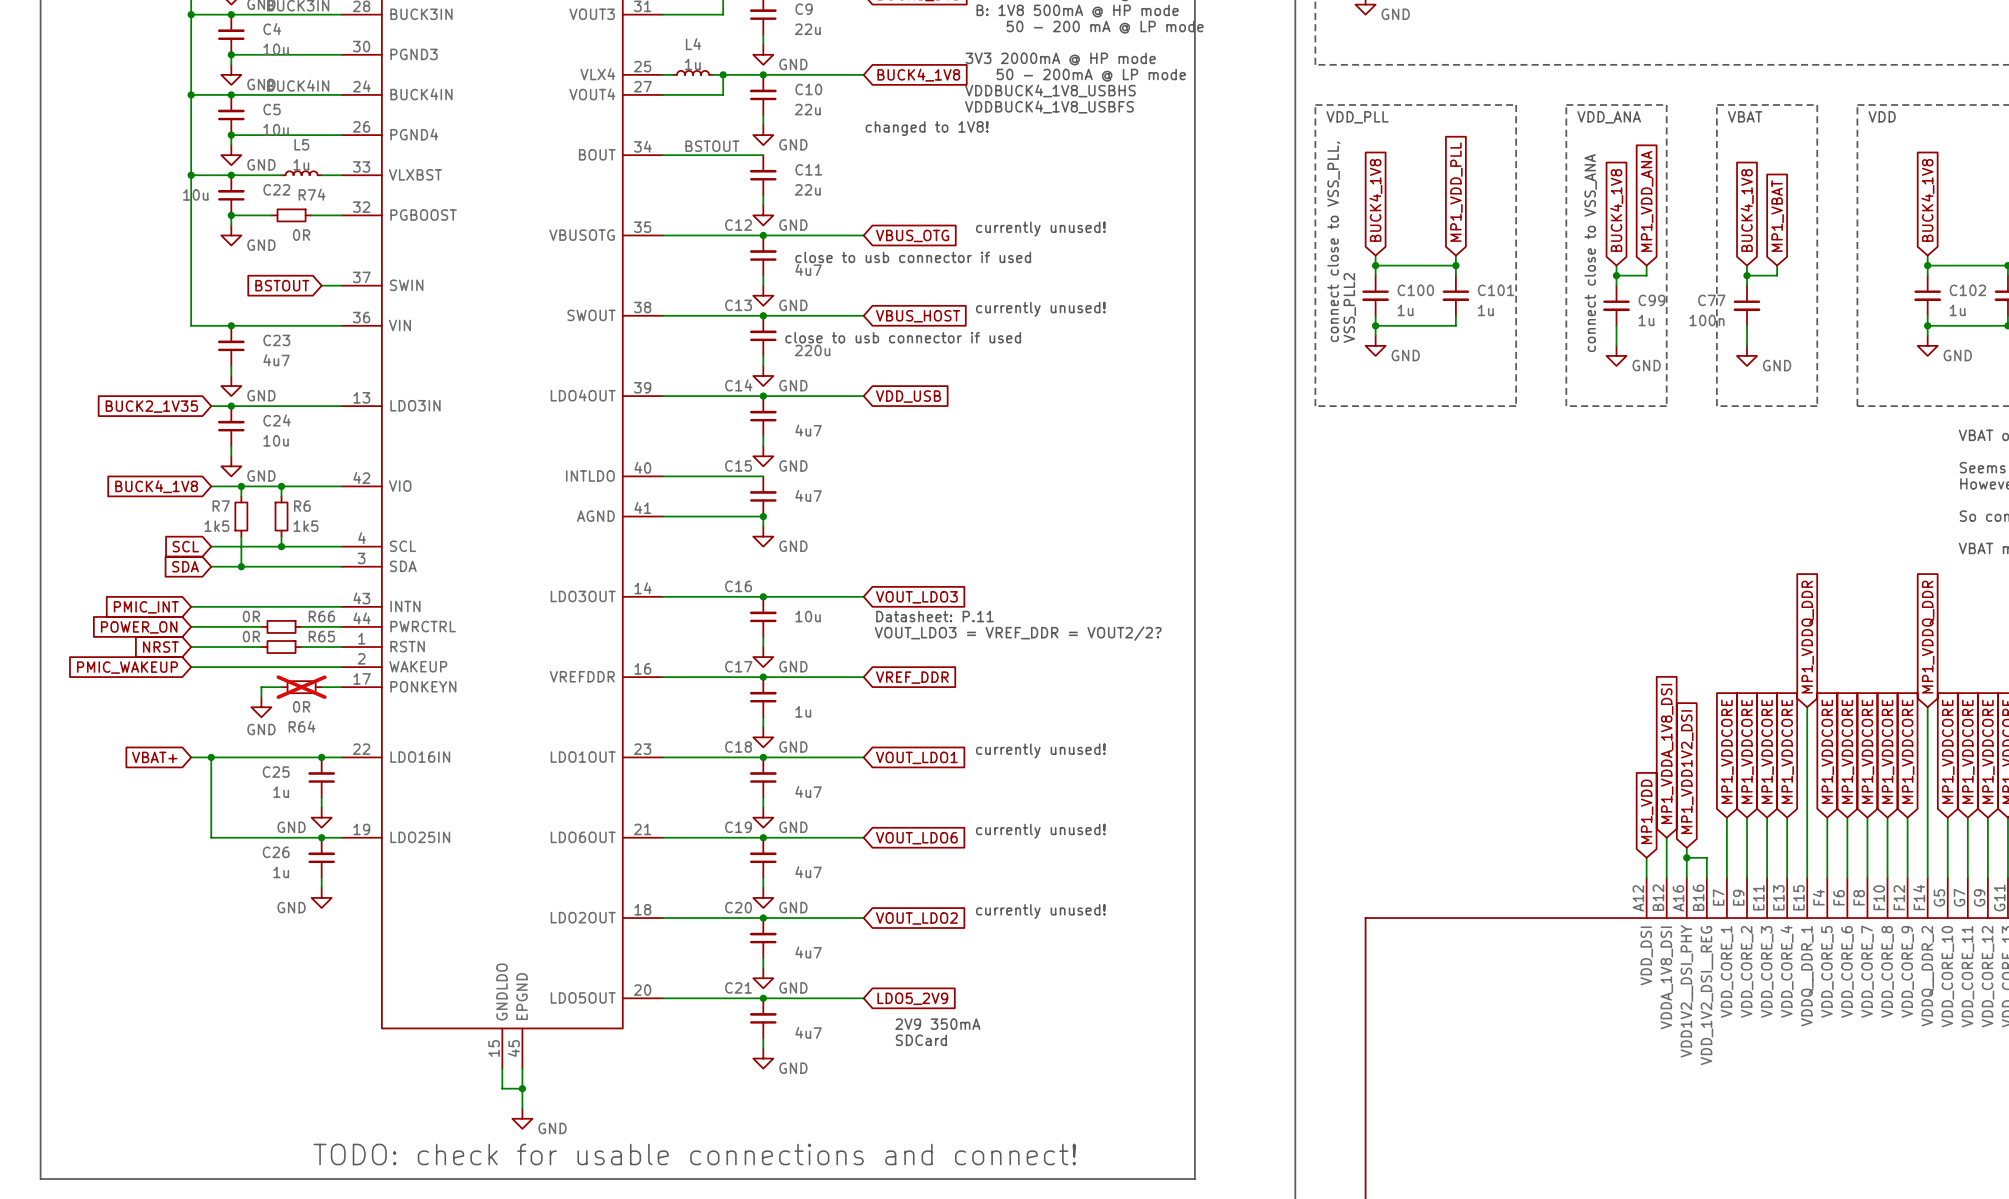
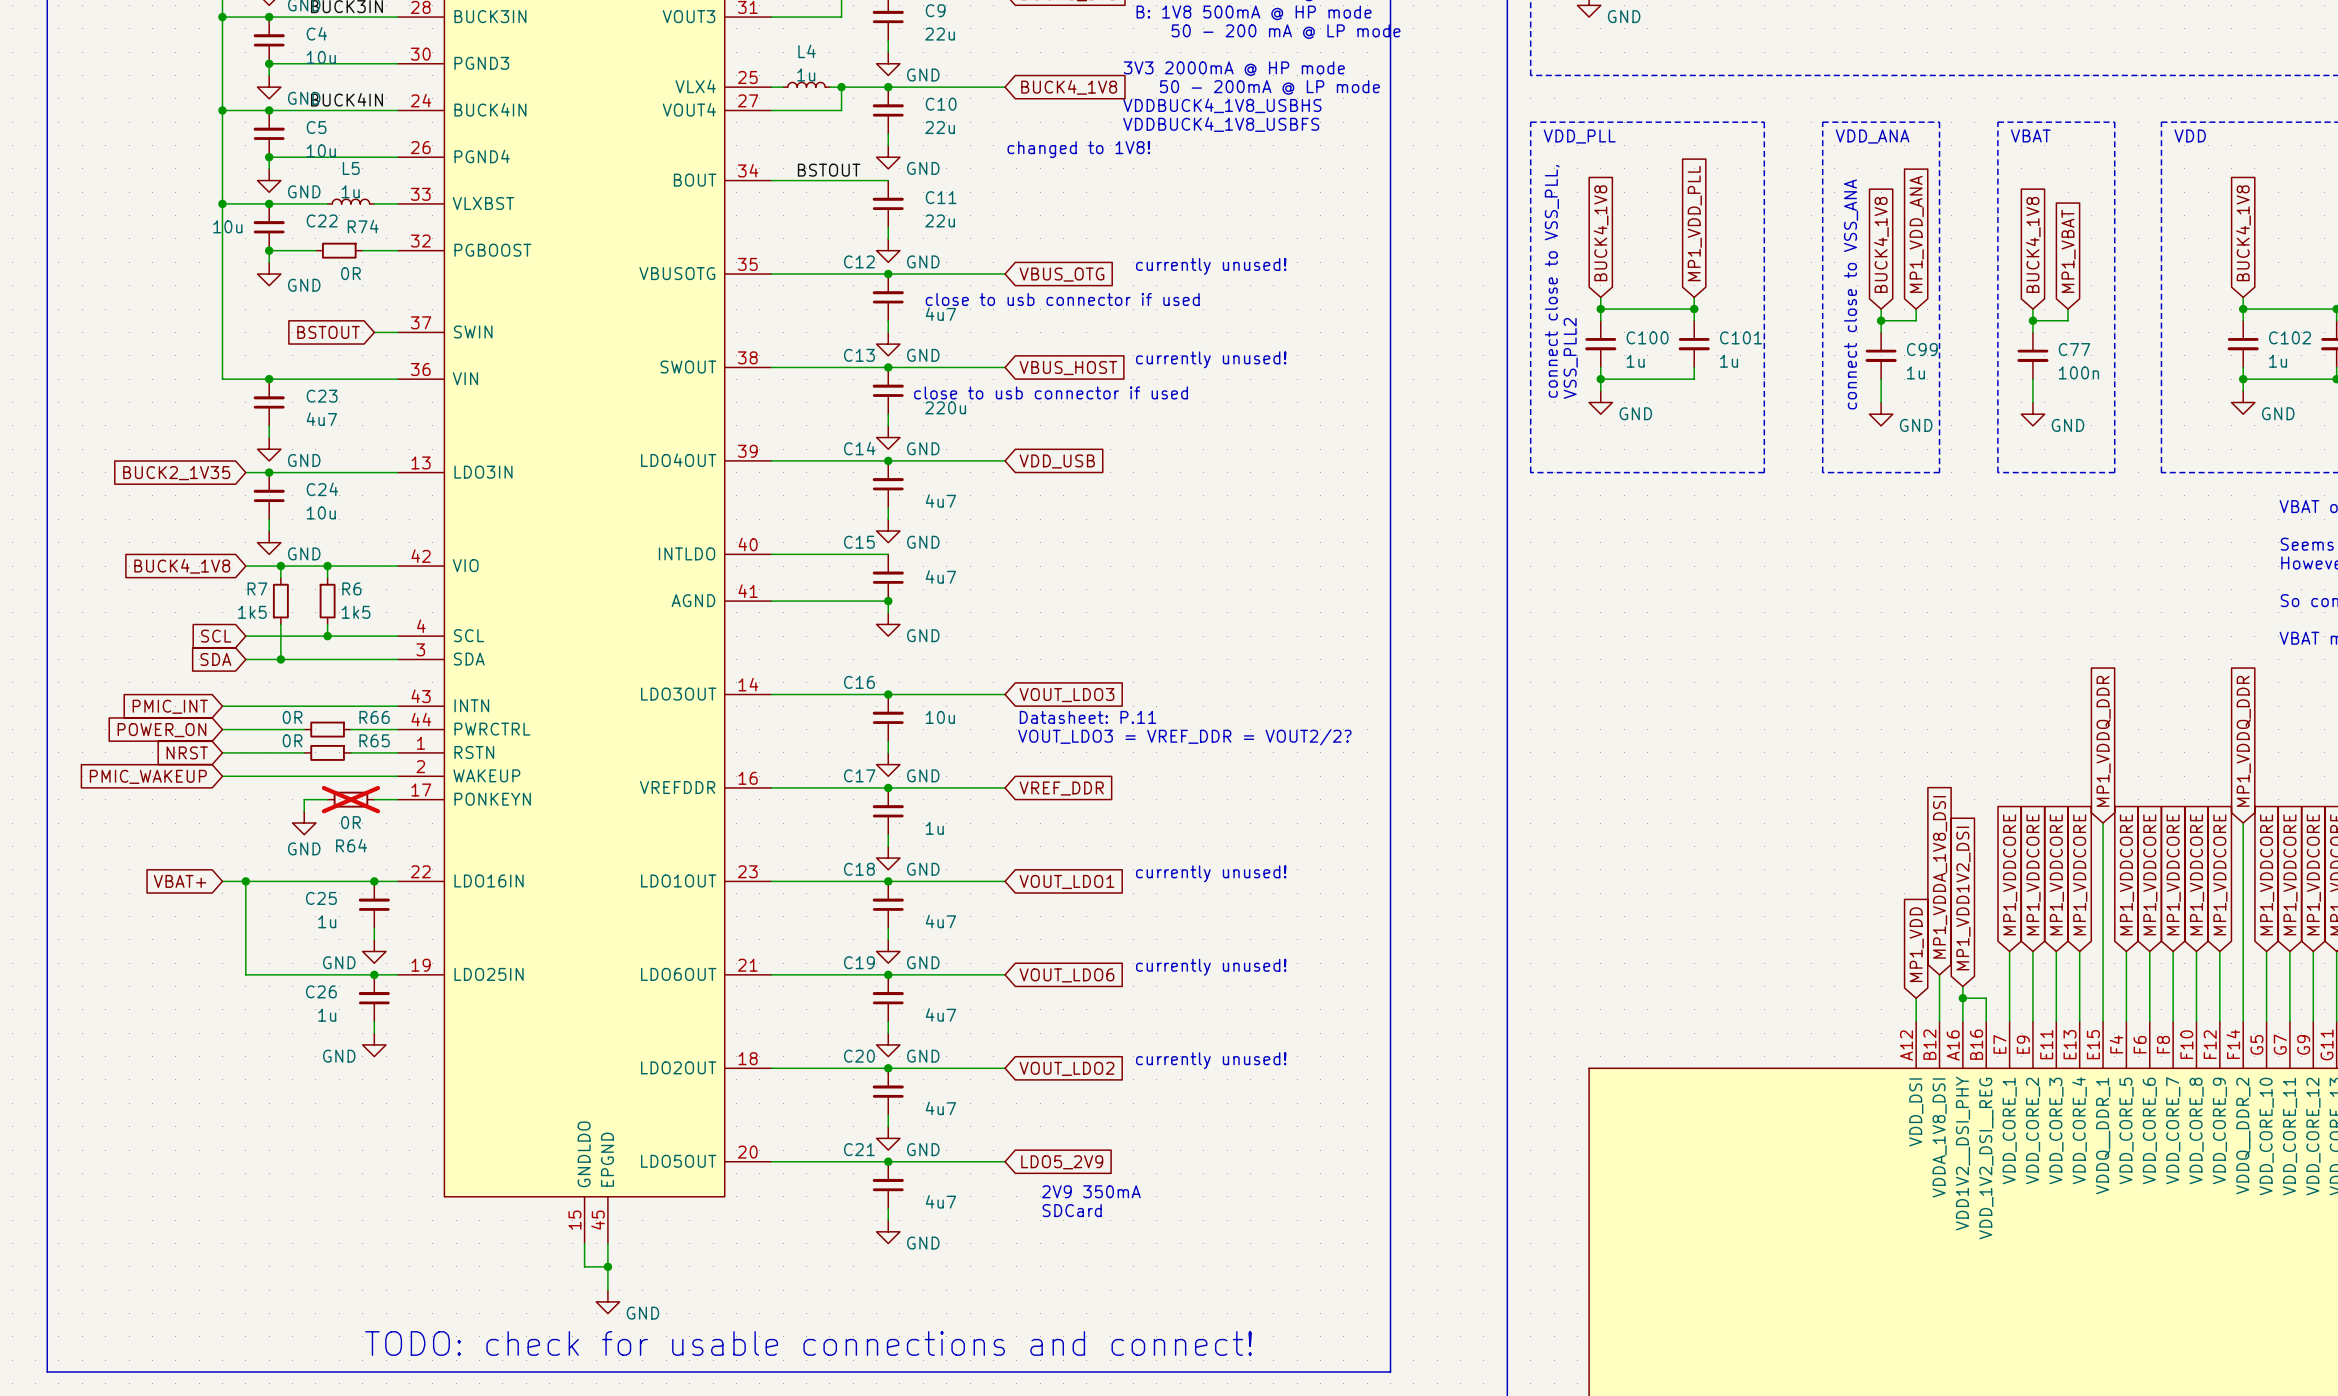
C77 name position: C77 (1711, 300) -> C77 (2074, 349)
C77 value position: 100n (1707, 320) -> 100n (2078, 372)

